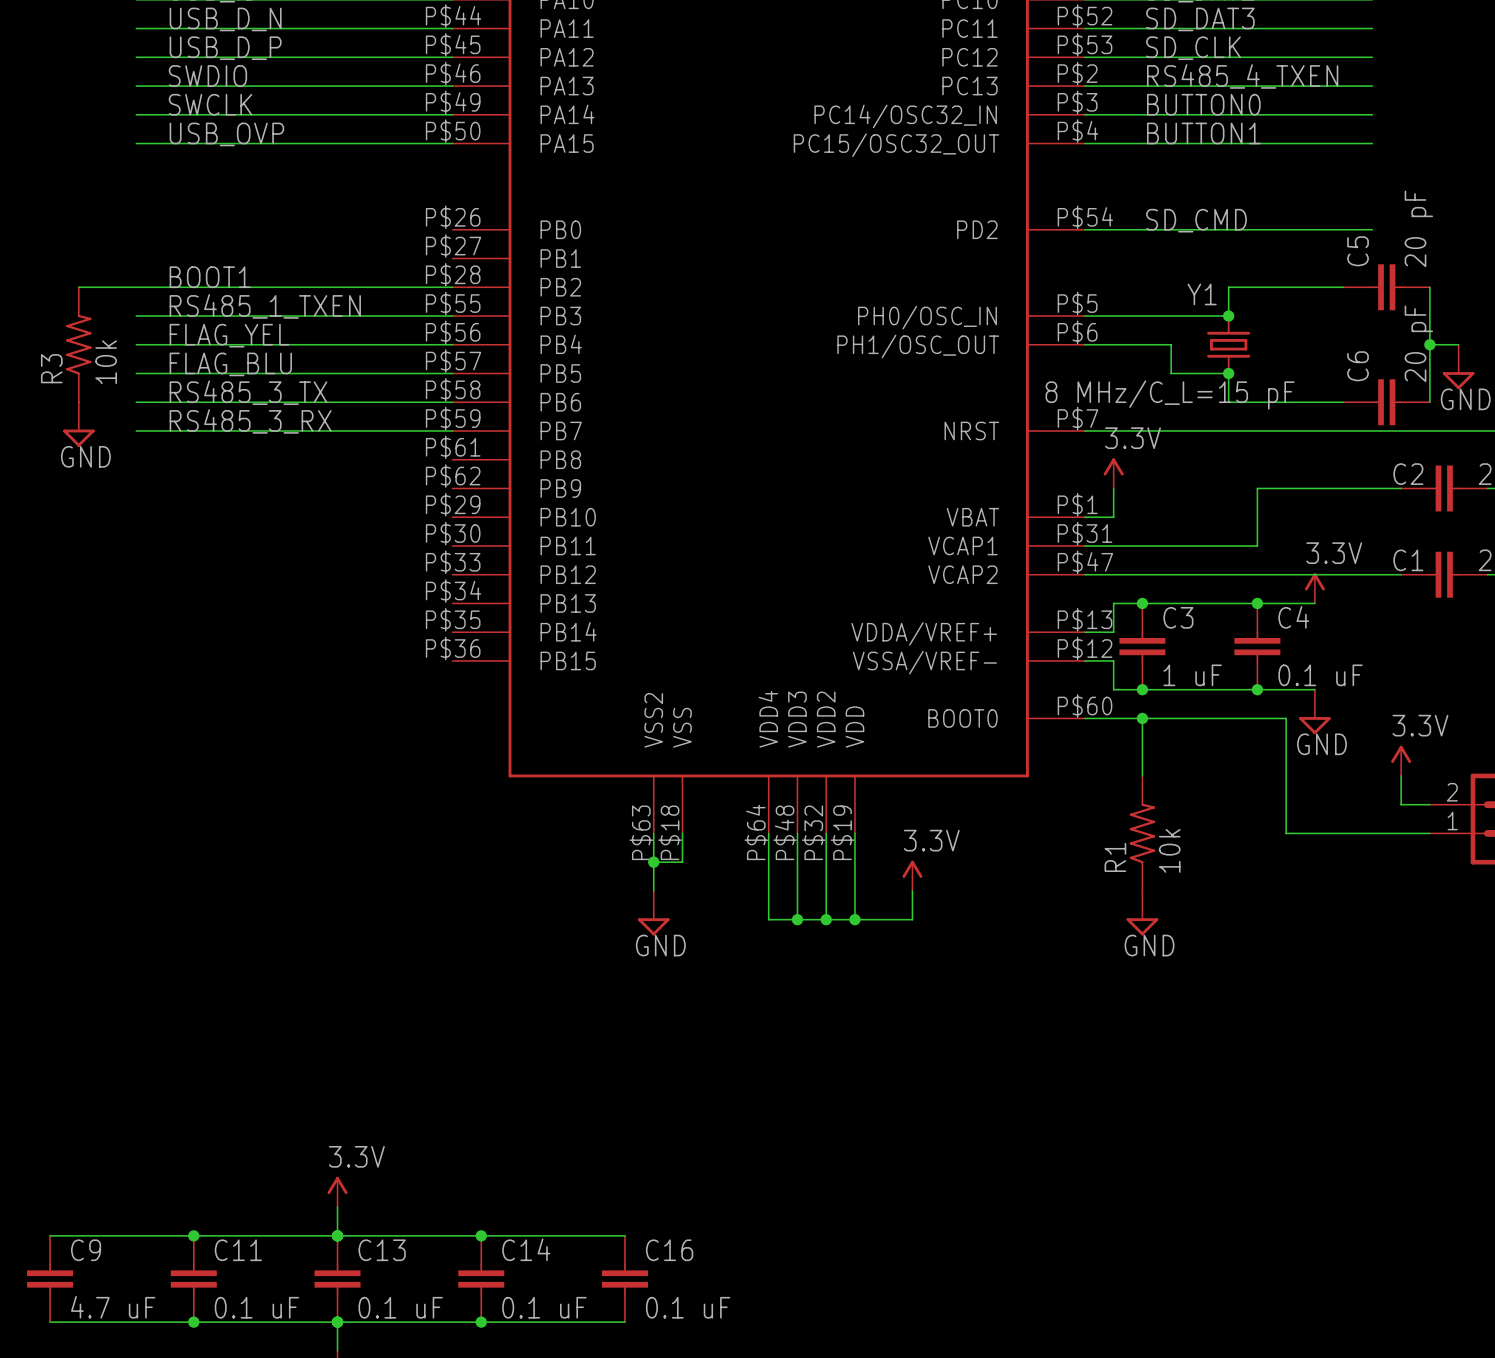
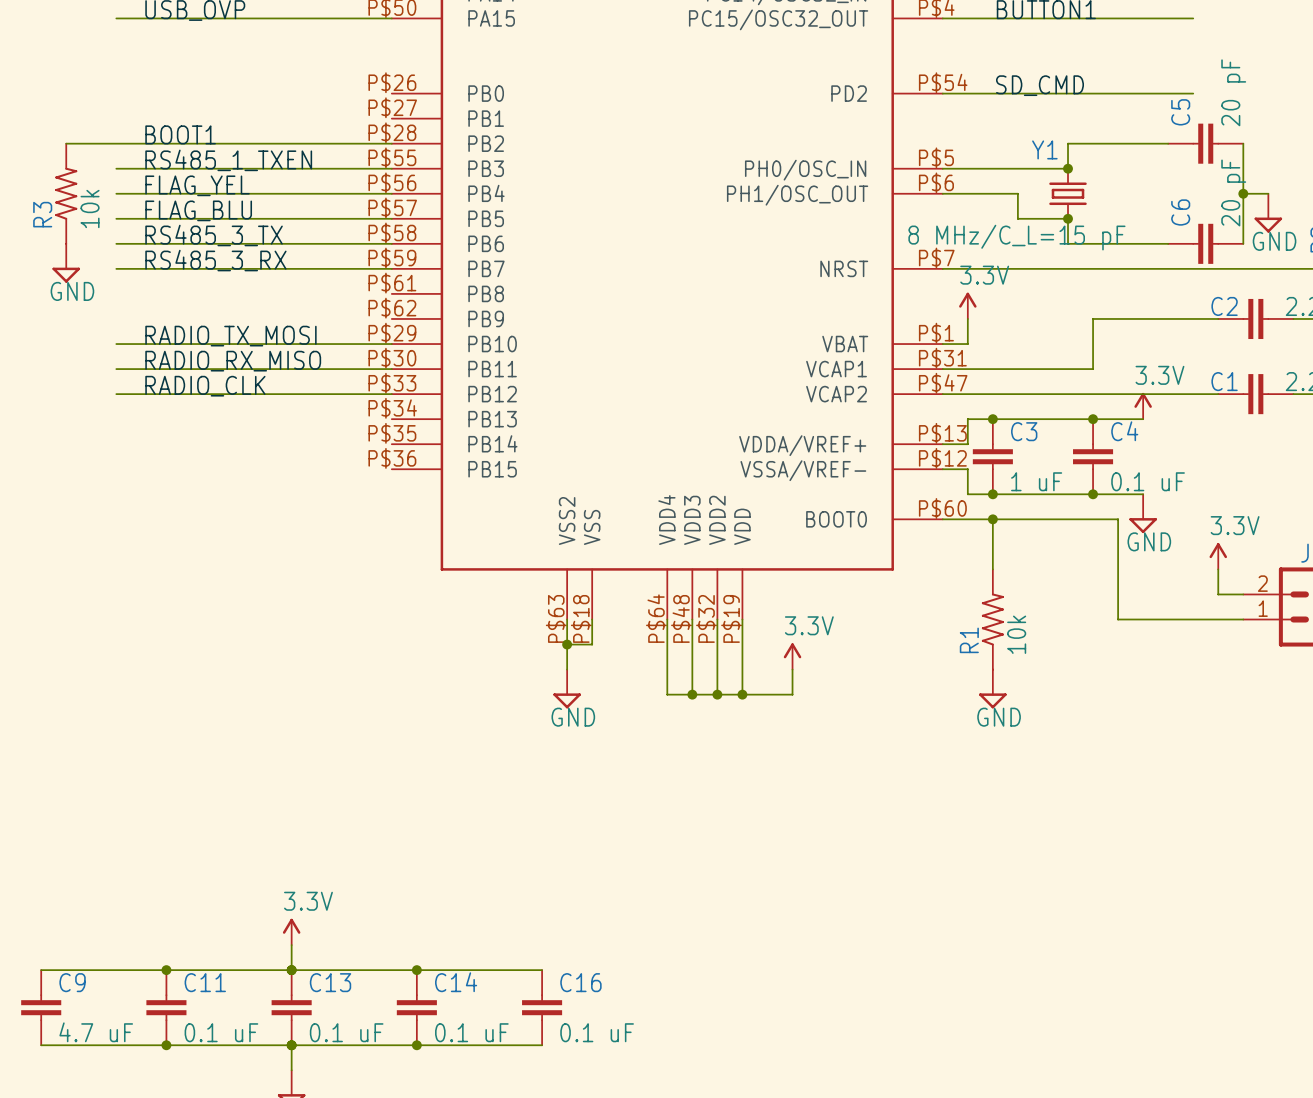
label: none -> RADIO_TX_MOSI (230, 336)
wire: none -> (116, 344) (391, 344)
label: none -> RADIO_RX_MISO (233, 361)
wire: none -> (116, 369) (391, 369)
label: none -> RADIO_CLK (205, 386)
wire: none -> (116, 394) (391, 394)

